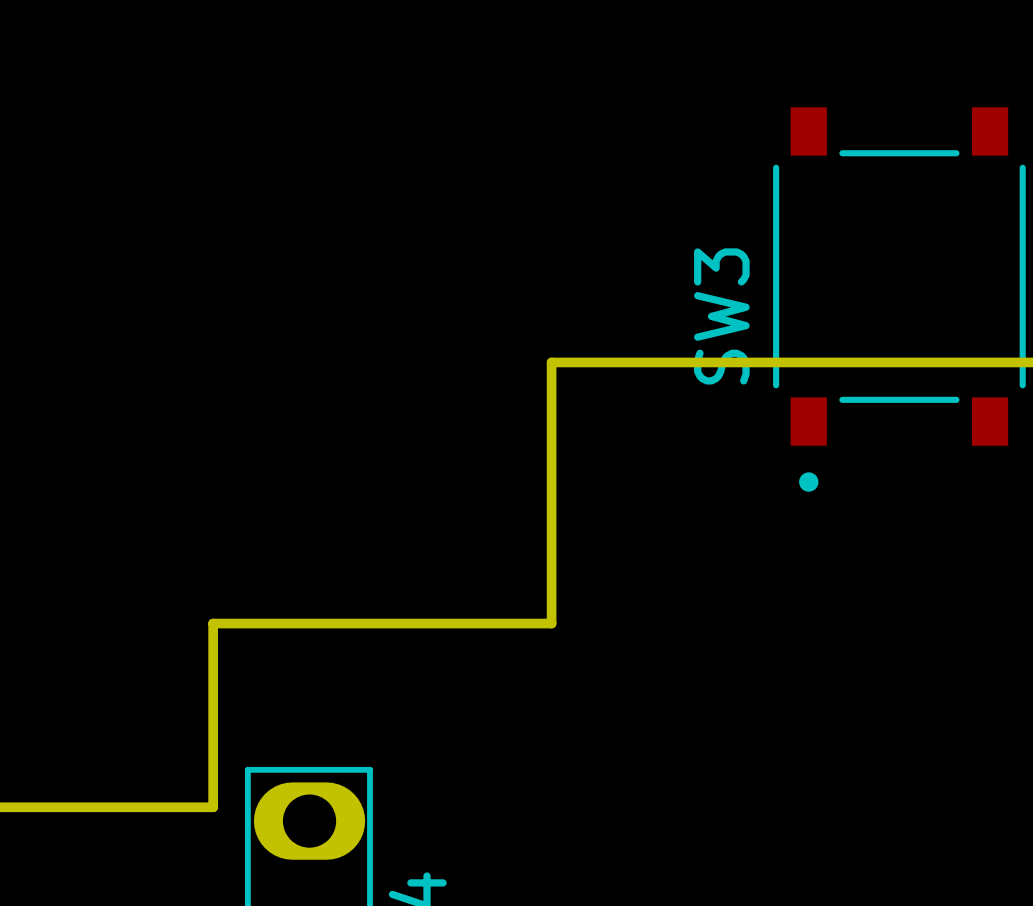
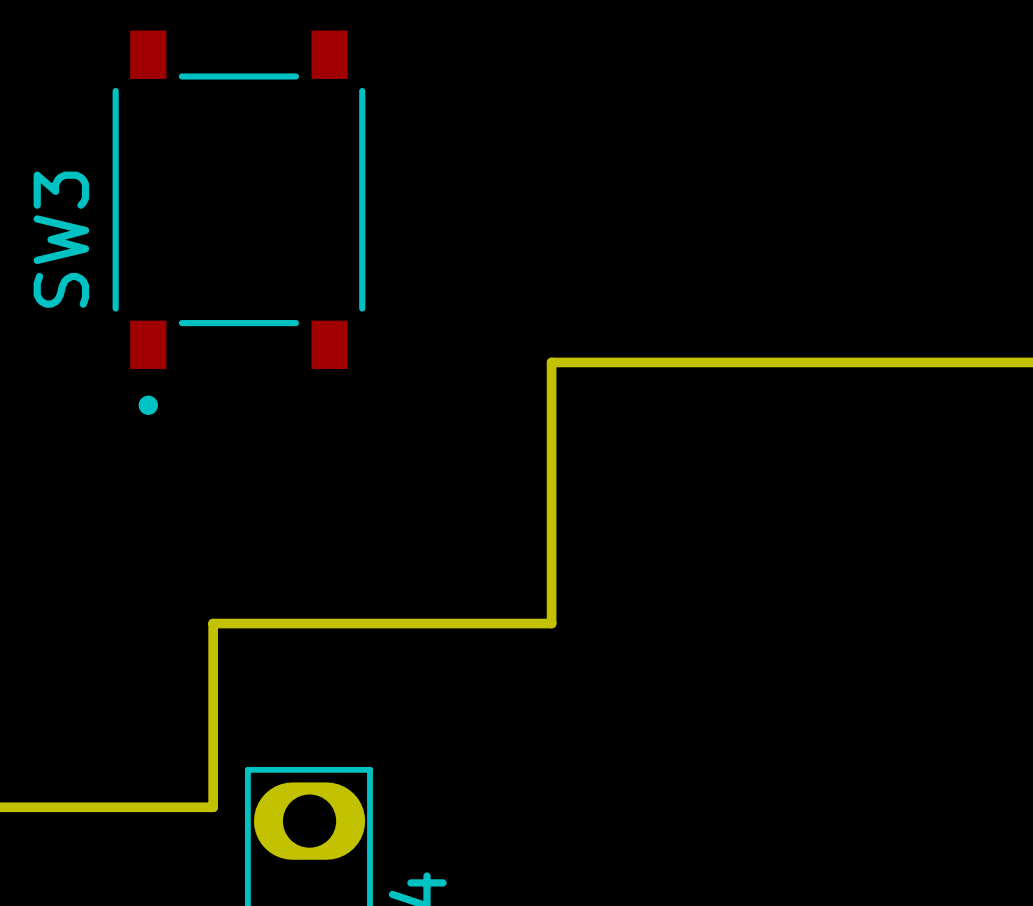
SW3 position: (899, 299) -> (238, 222)

